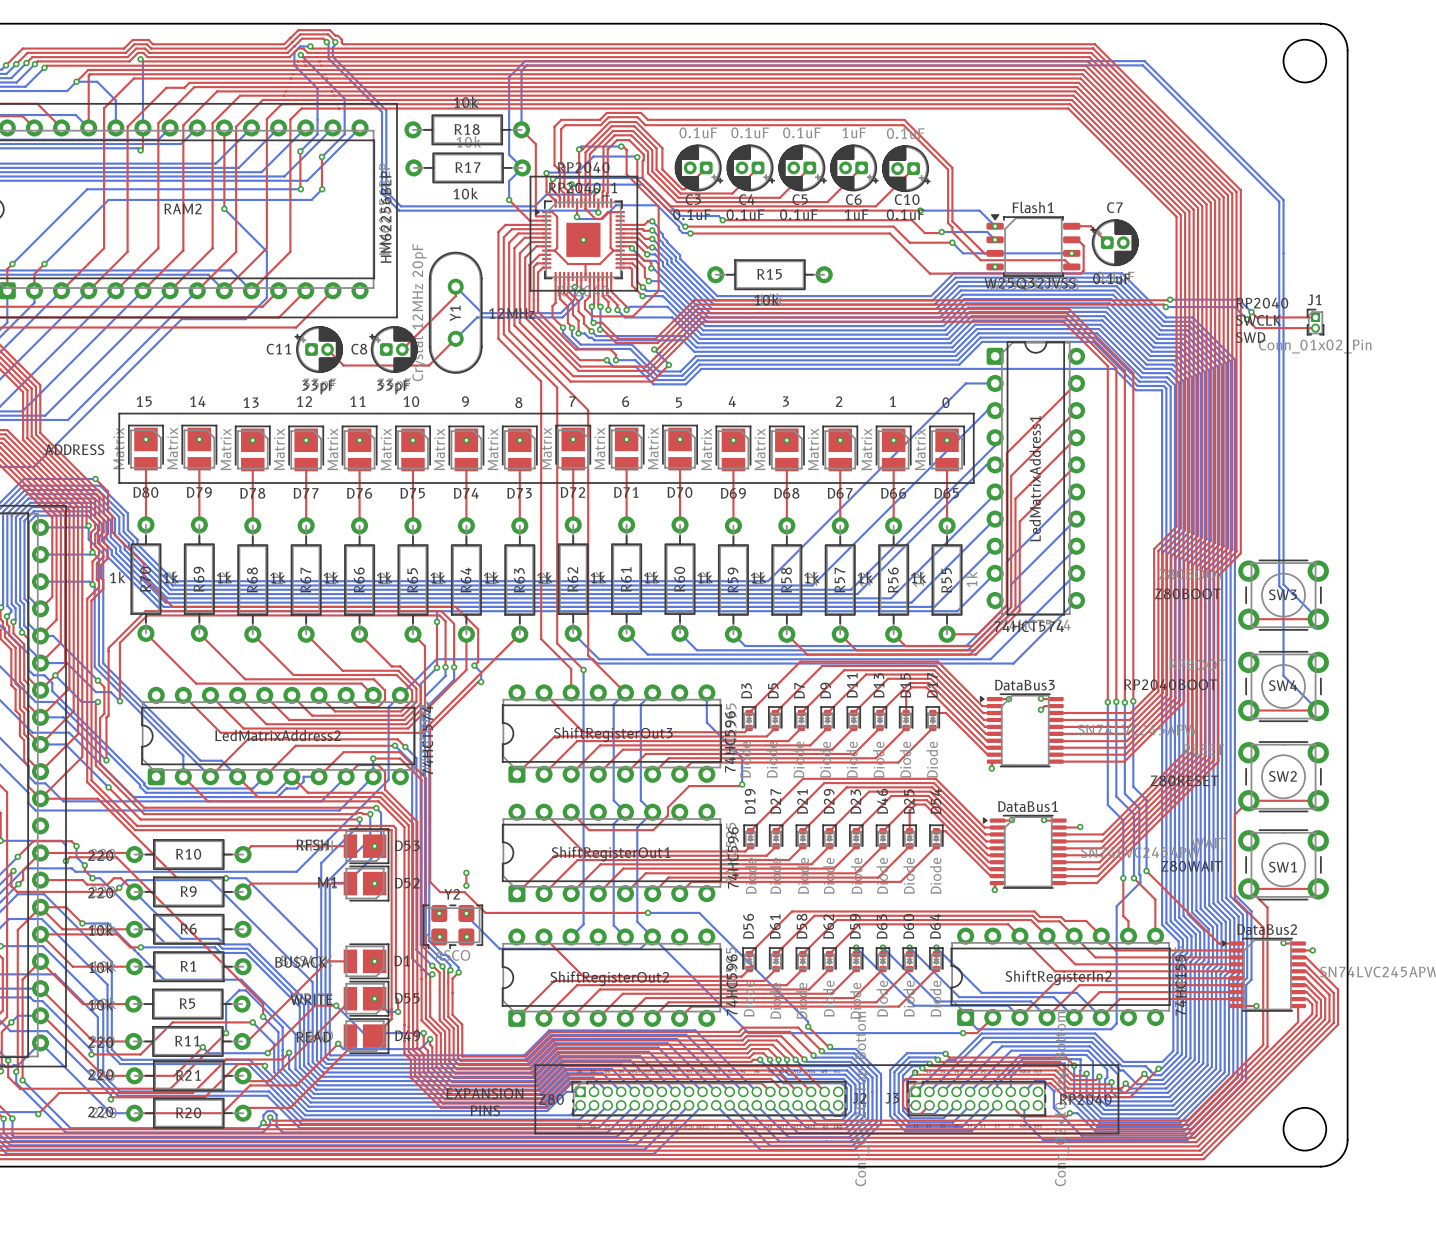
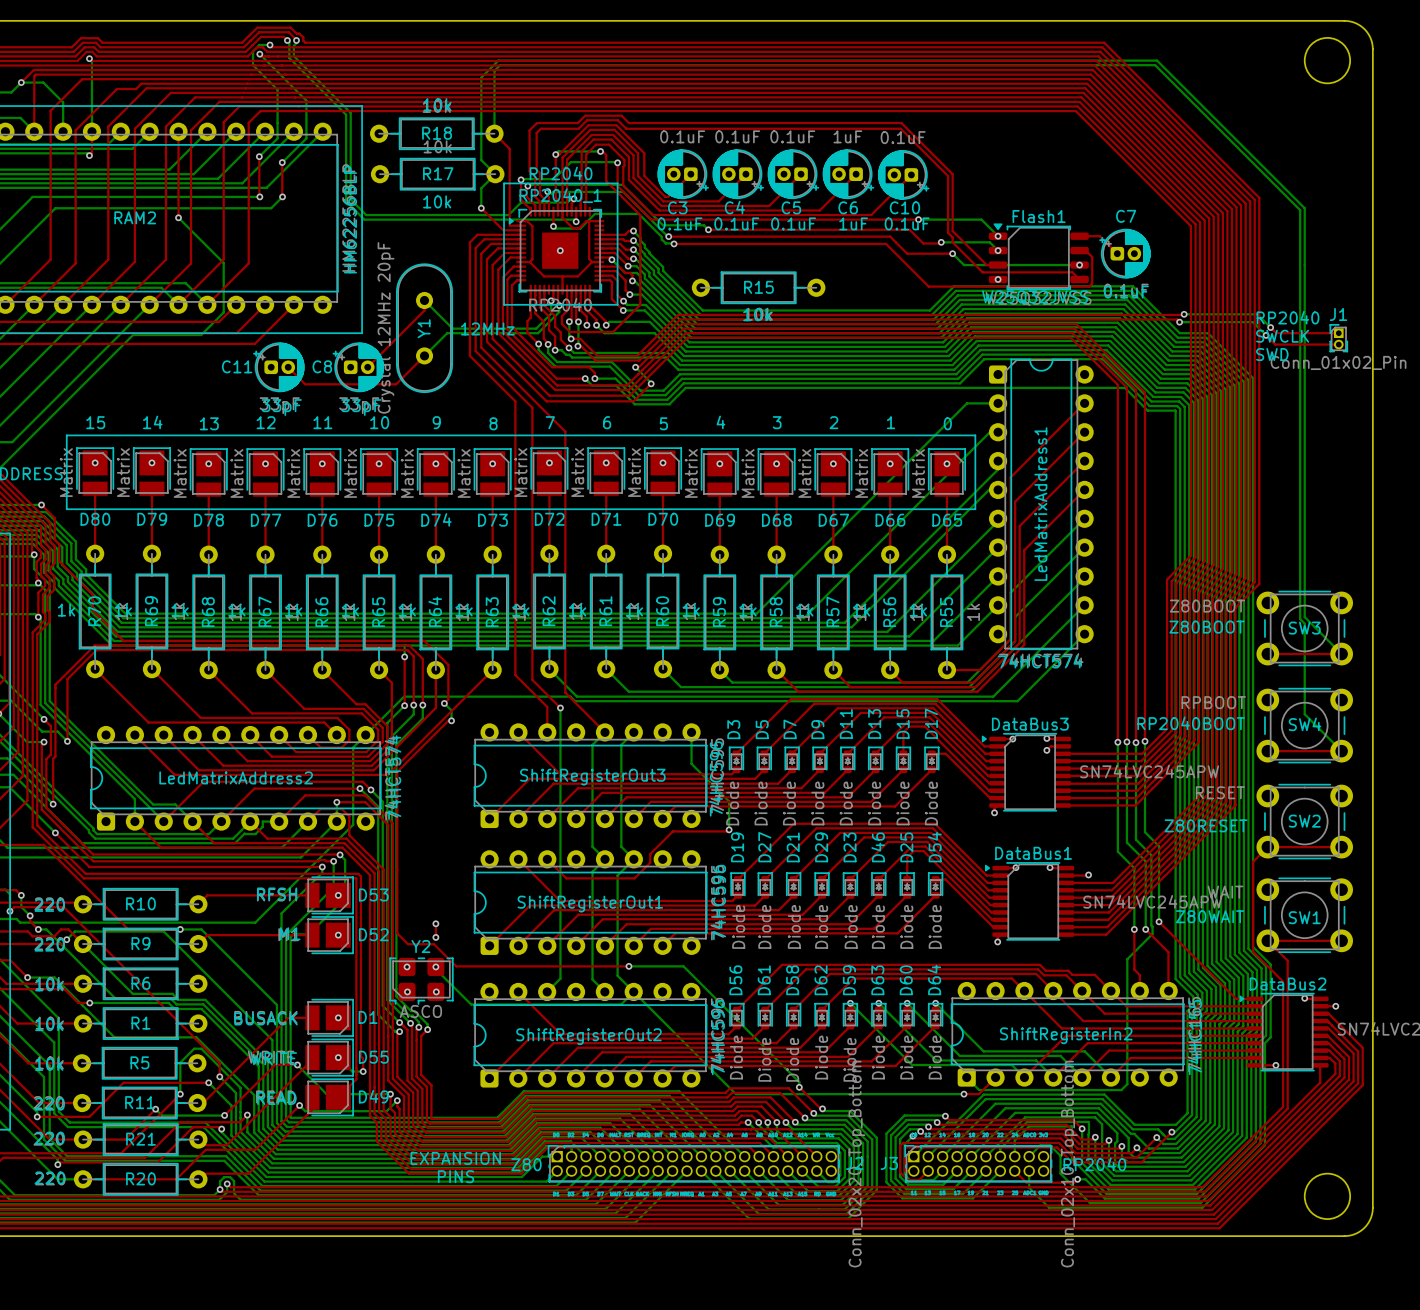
line: (535, 1065) (1118, 1065) (1118, 1133) (535, 1133) (535, 1065) -> none

